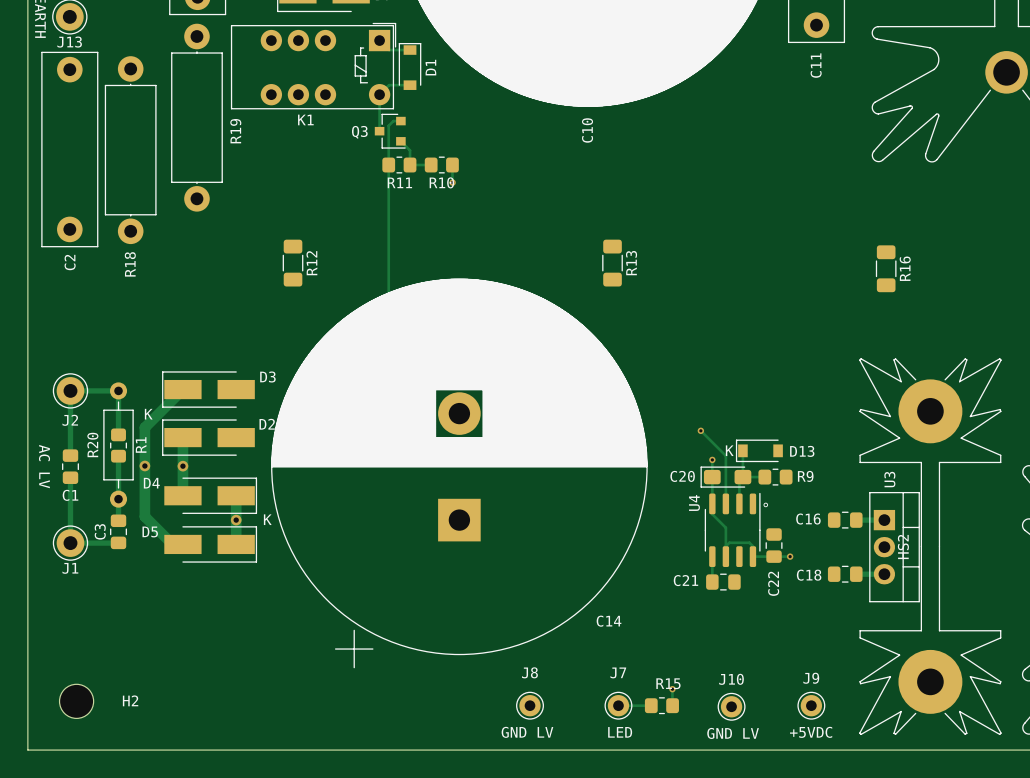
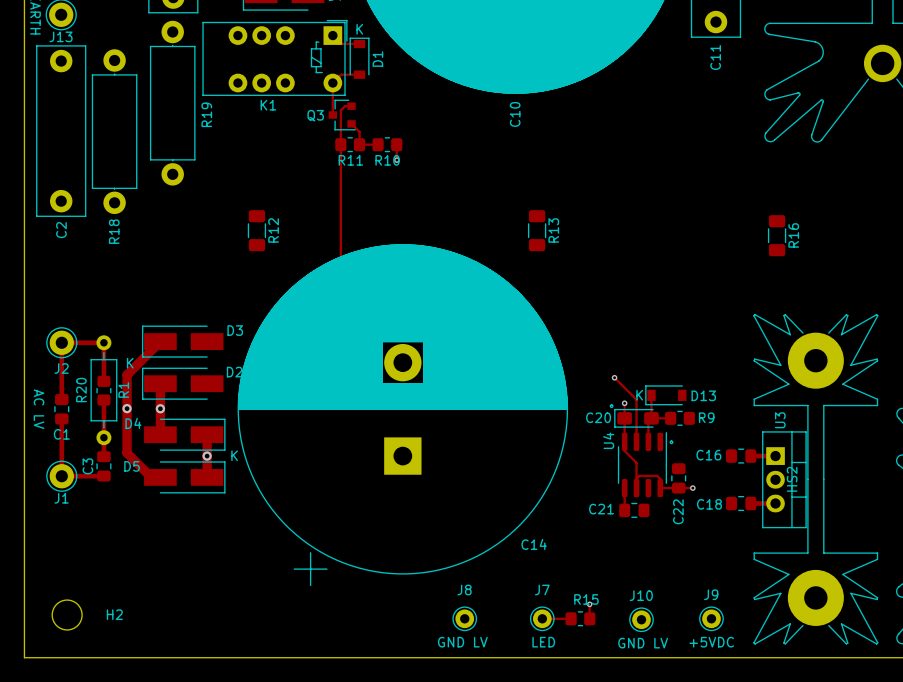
text: none -> K (359, 29)
text: none -> ° (611, 406)

